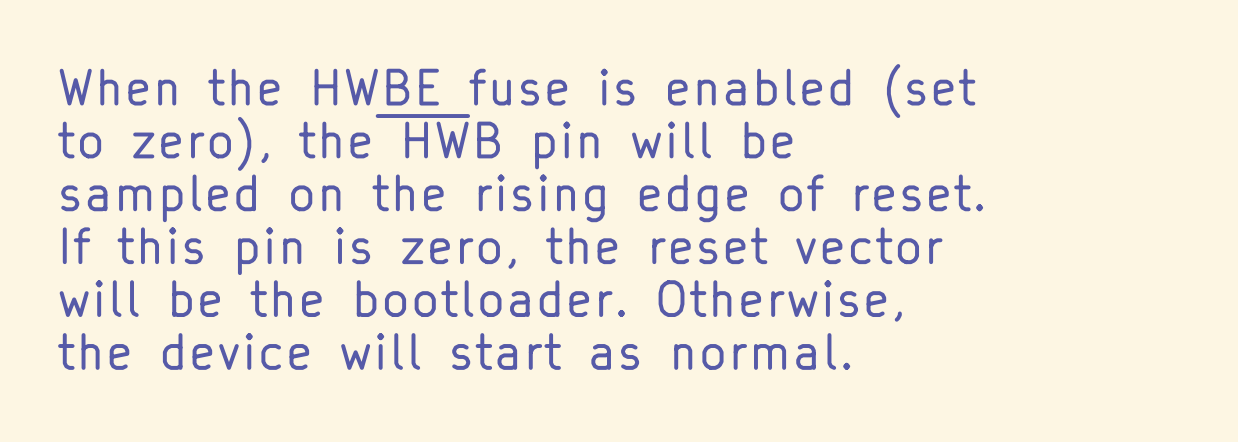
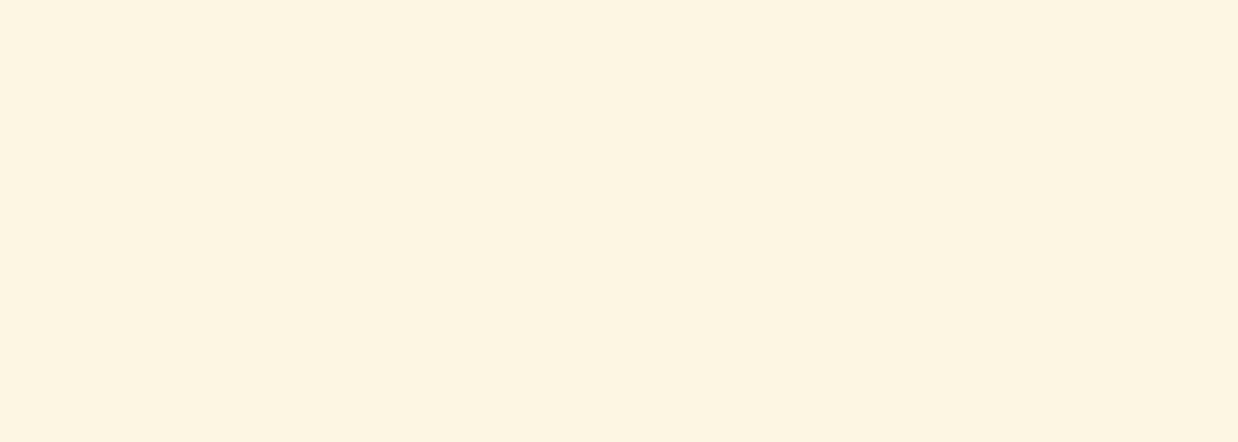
text: When the HWBE fuse is enabled (set (517, 91) -> none
text: to zero), the~{ HW}B pin will be (425, 142) -> none
text: sampled on the rising edge of reset. (522, 198) -> none
text: If this pin is zero, the reset vector (502, 251) -> none
text: will be the bootloader. Otherwise, (480, 300) -> none
text: the device will start as normal. (454, 351) -> none

